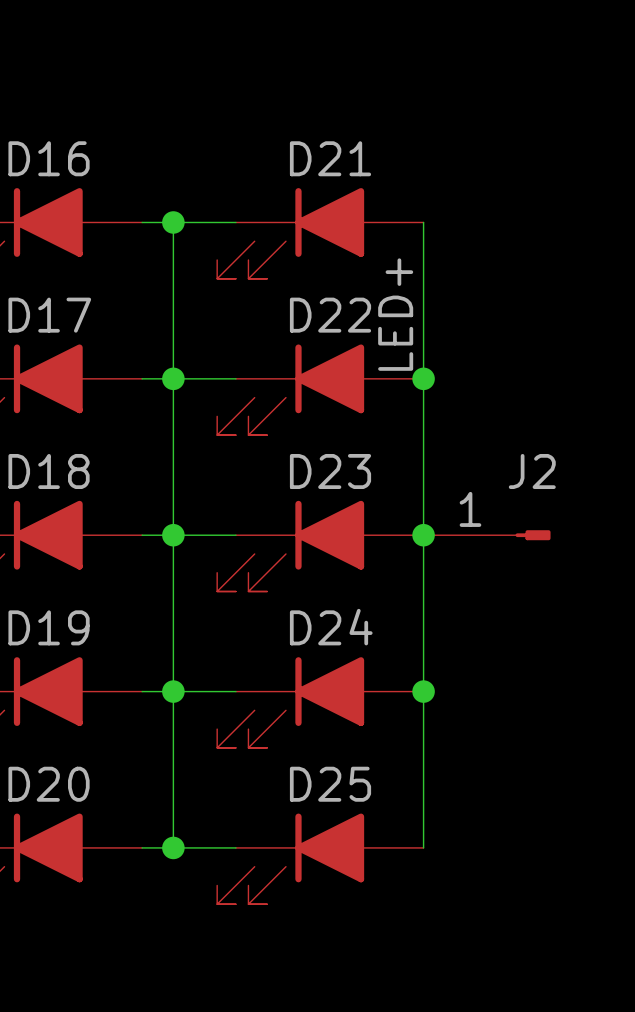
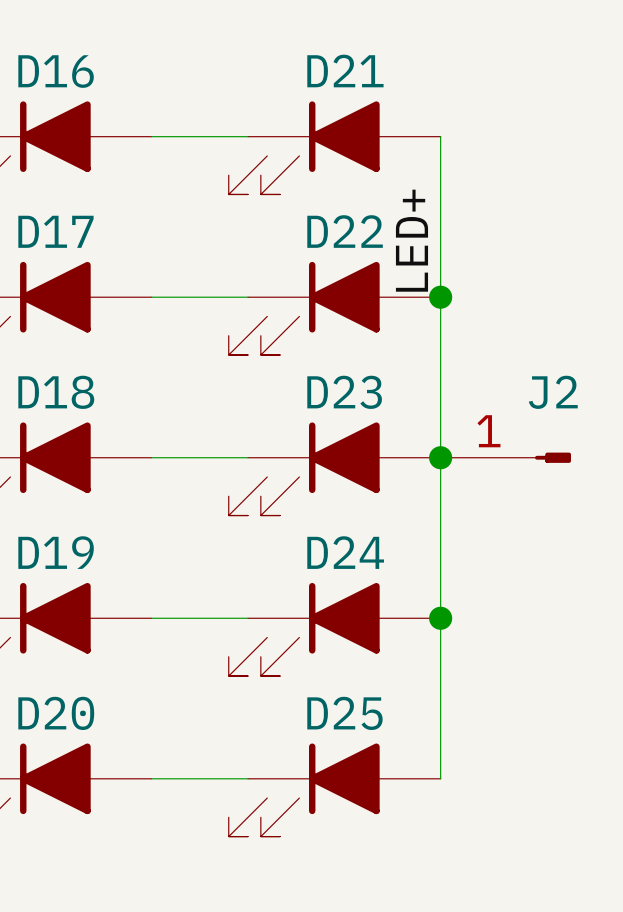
wire: (173, 222) (173, 847) -> none
junction: (173, 222) -> none
junction: (173, 378) -> none
junction: (173, 535) -> none
junction: (173, 691) -> none
junction: (173, 847) -> none

